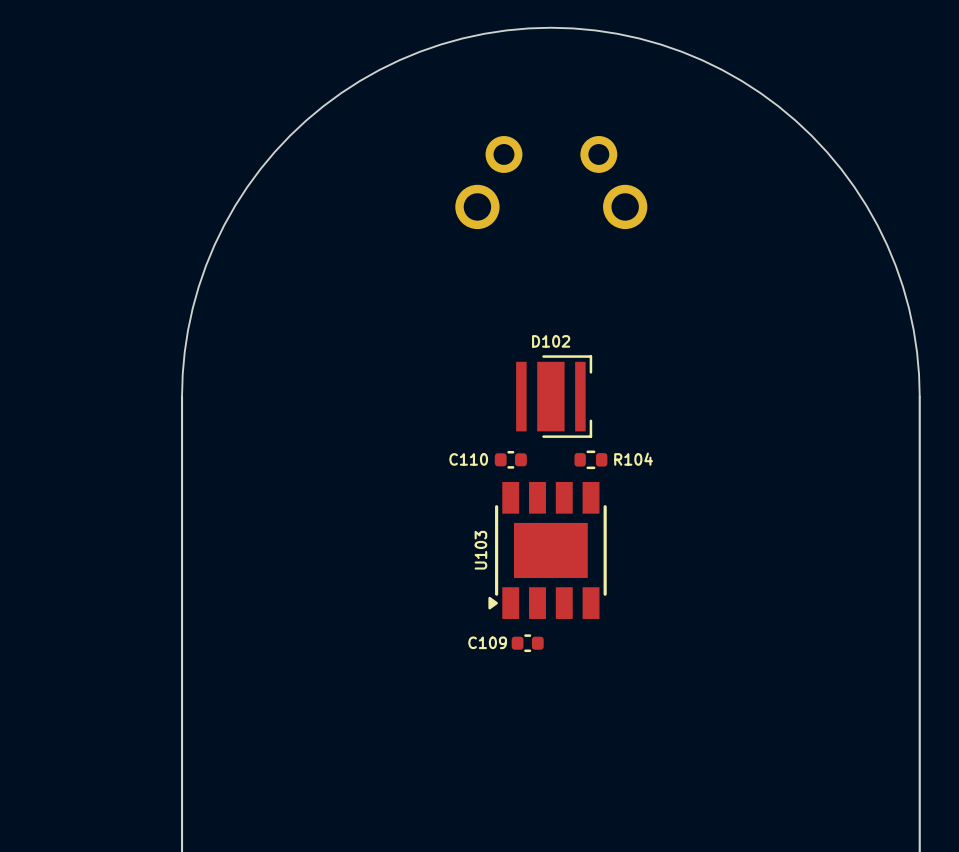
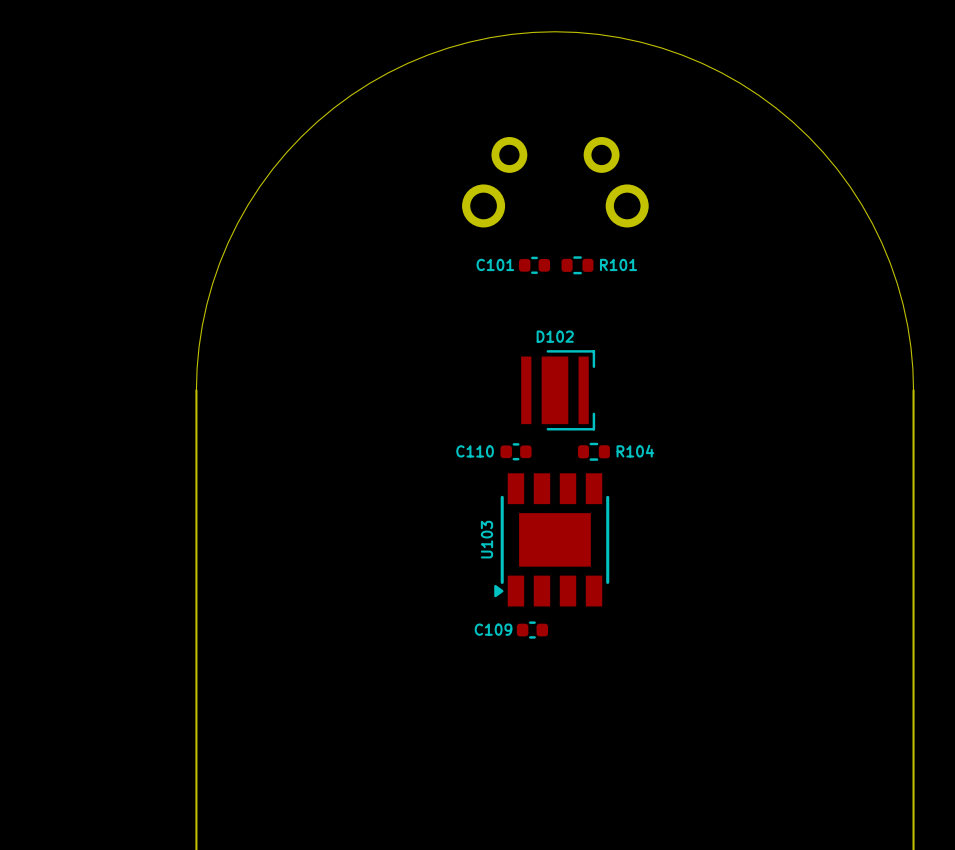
C101: none -> (534, 265)
R101: none -> (577, 265)

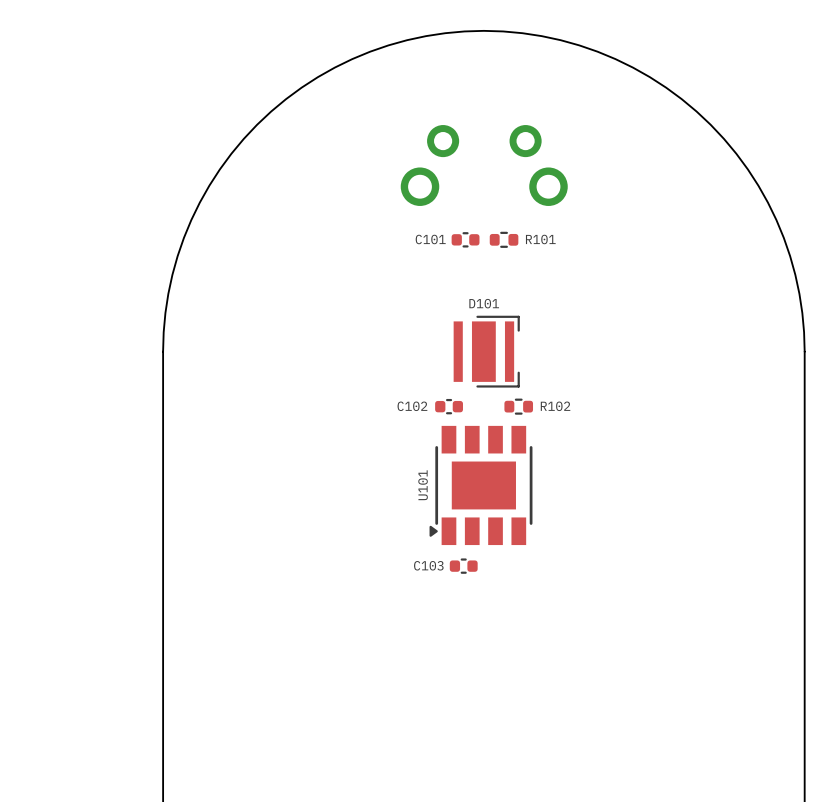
D102 name: D102 (555, 336) -> D101 (484, 303)
C110 name: C110 (475, 451) -> C102 (412, 406)
R104 name: R104 (635, 451) -> R102 (555, 406)
U103 name: U103 (486, 539) -> U101 (423, 485)
C109 name: C109 (493, 629) -> C103 (428, 565)

